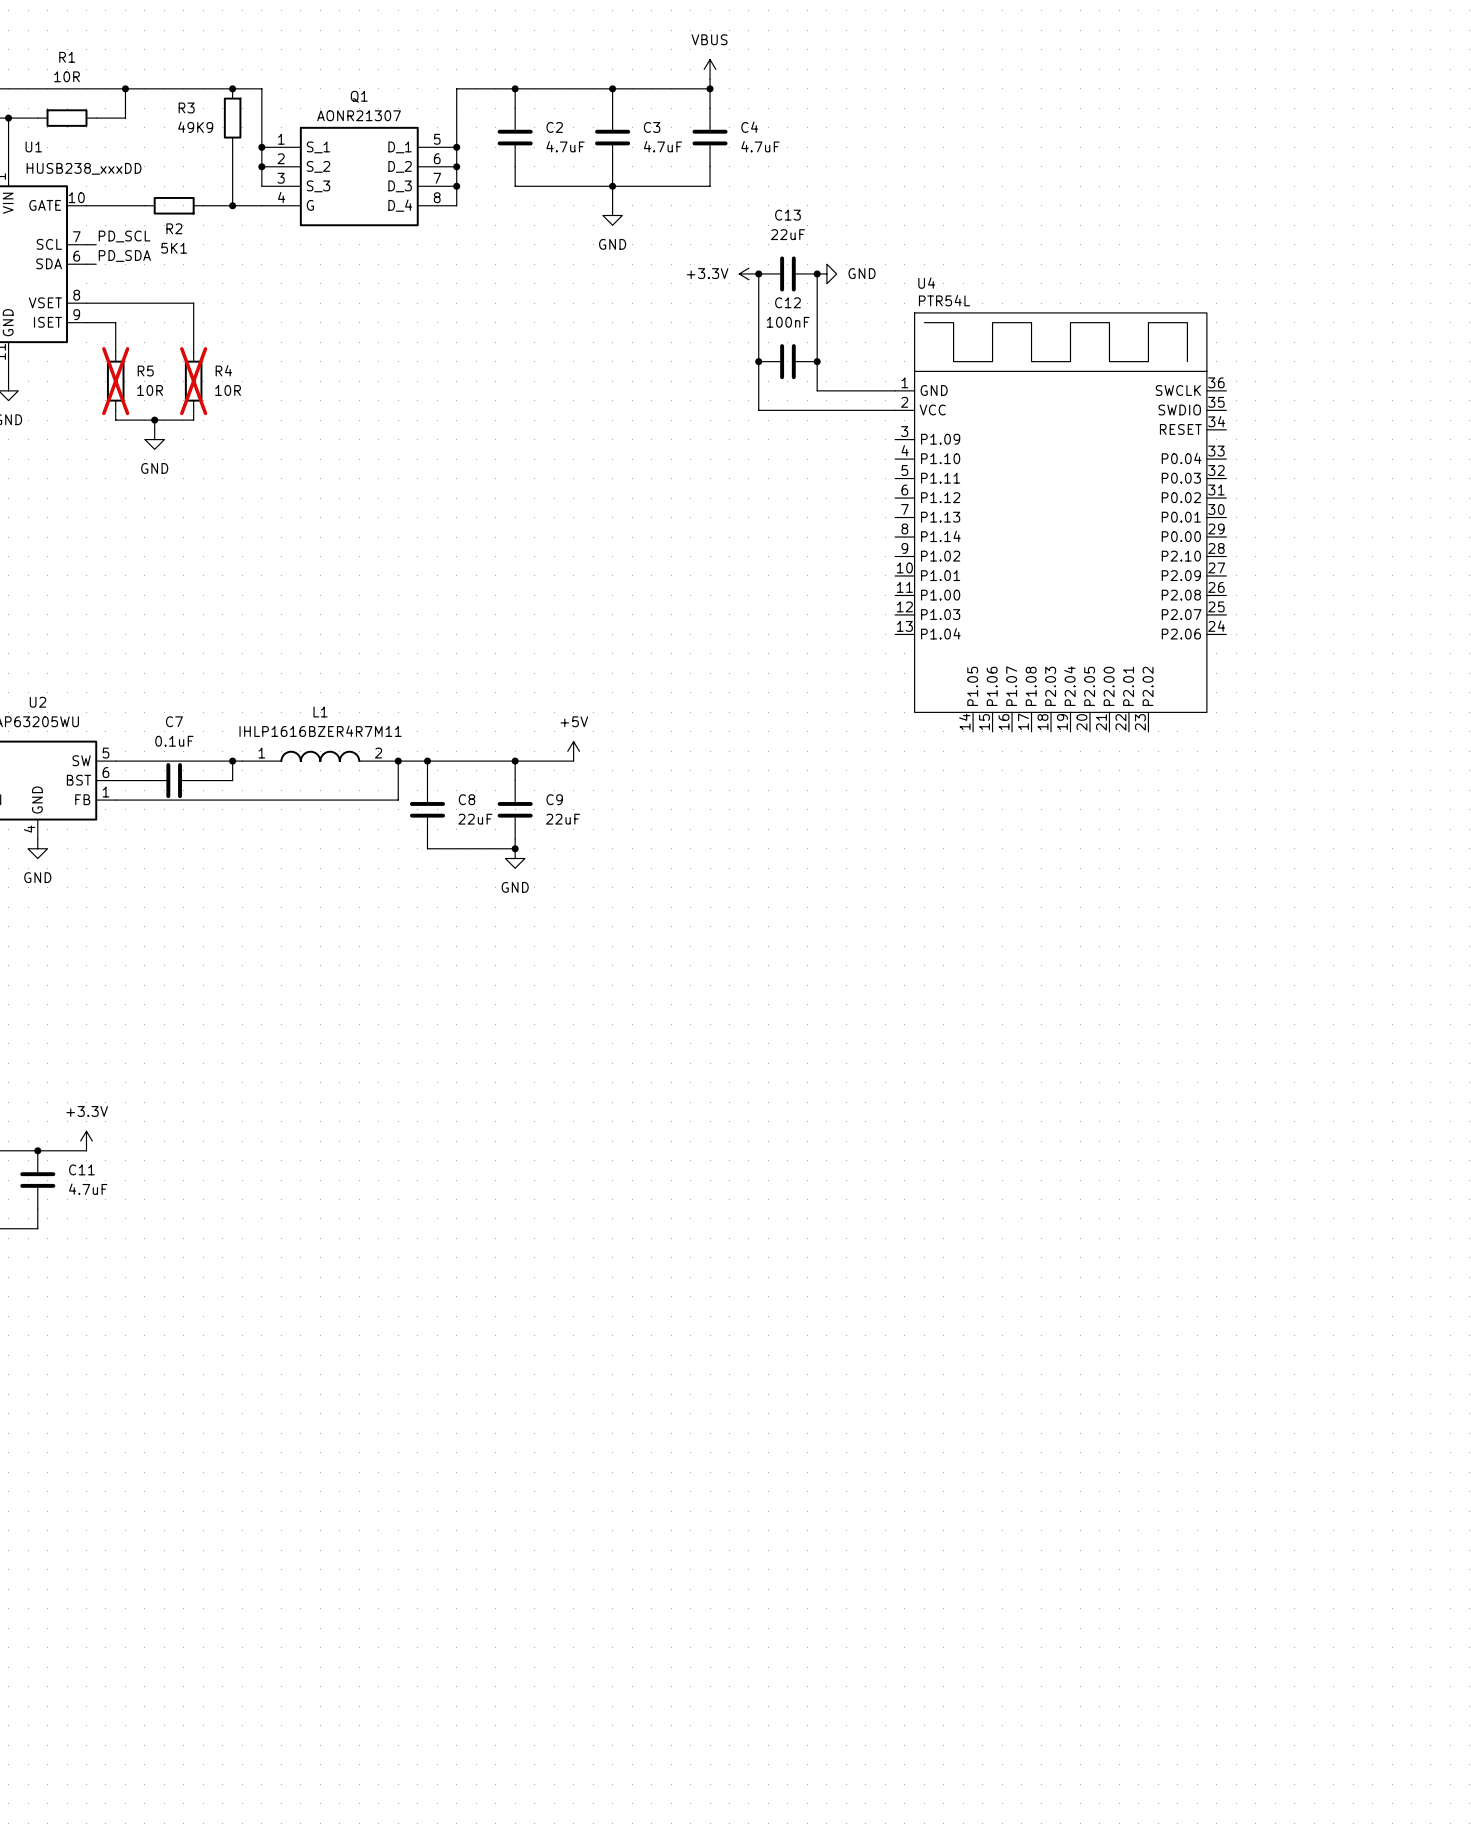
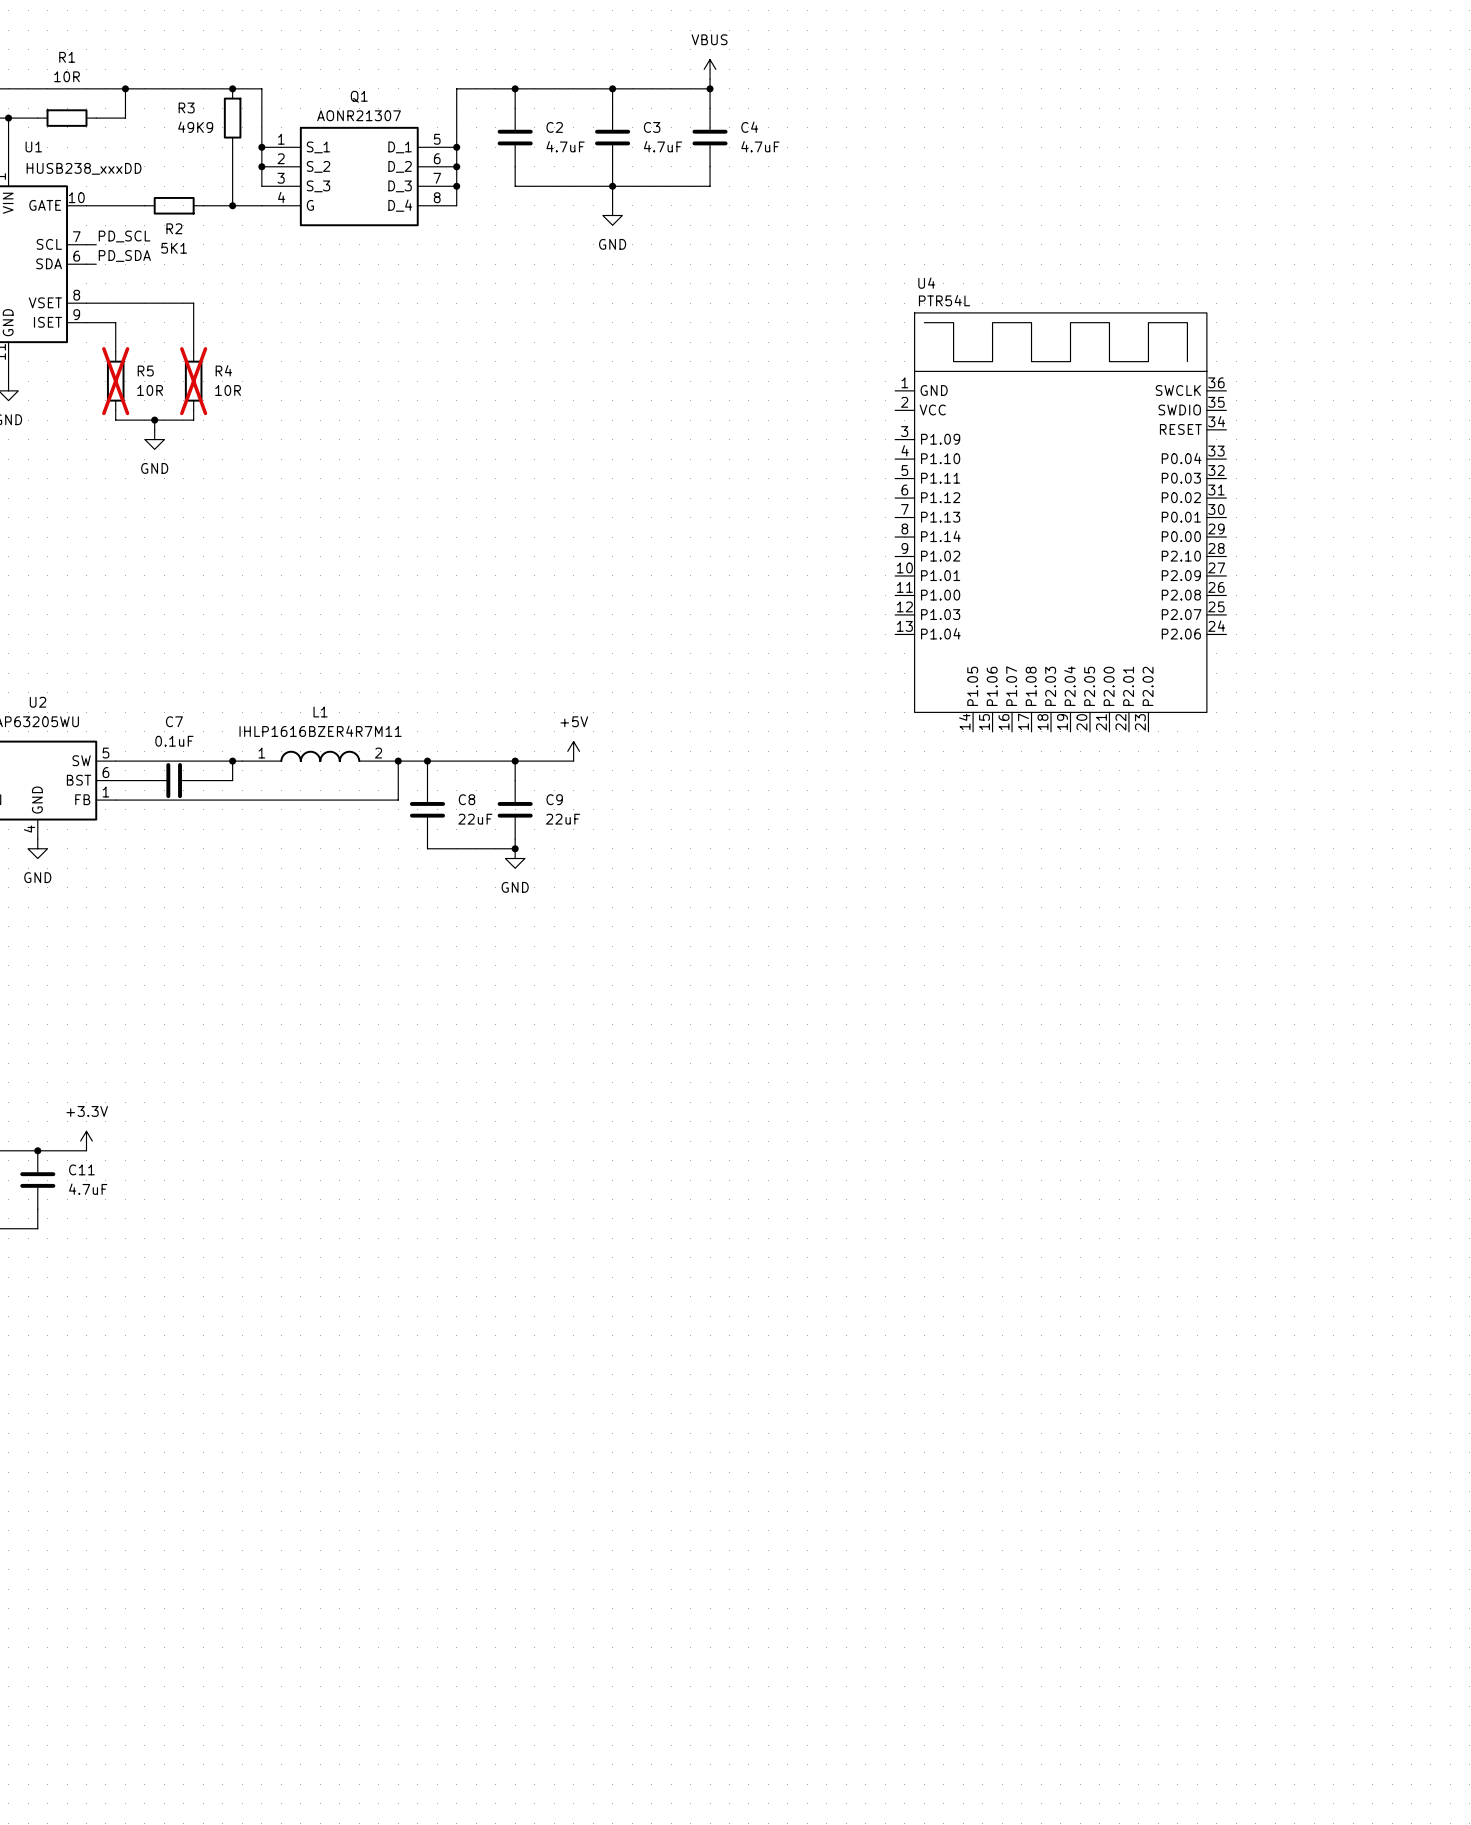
power symbol: +3.3V (748, 273) -> none
wire: (758, 273) (758, 410) (895, 410) -> none
junction: (758, 273) -> none
C13: 22uF (787, 273) -> none
wire: (817, 273) (817, 390) (895, 390) -> none
junction: (817, 273) -> none
power symbol: GND (826, 273) -> none
junction: (758, 361) -> none
C12: 100nF (787, 361) -> none
junction: (817, 361) -> none

